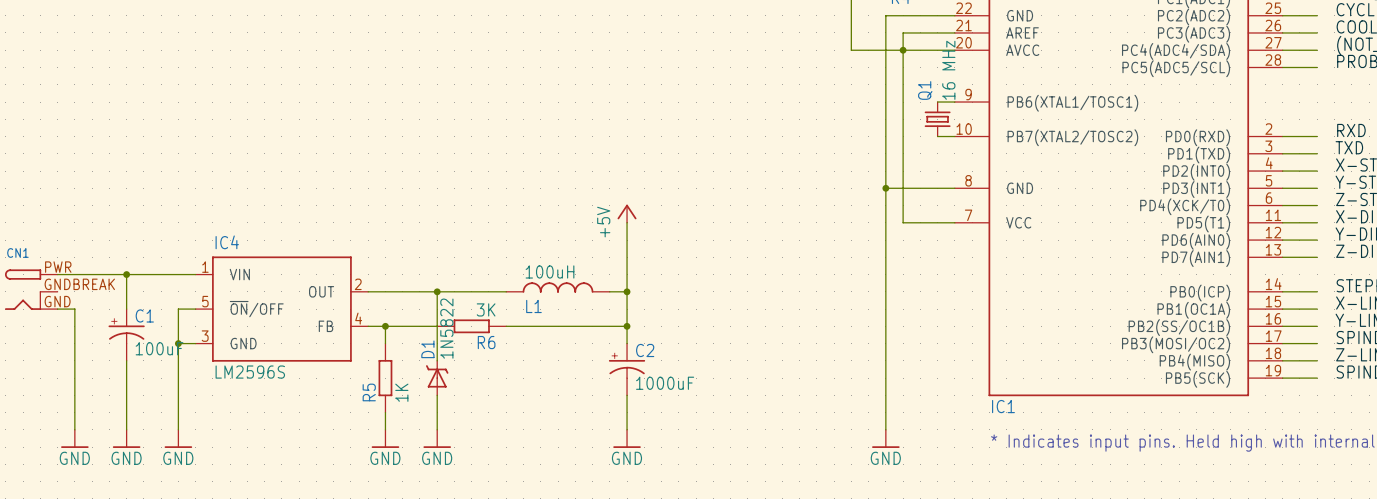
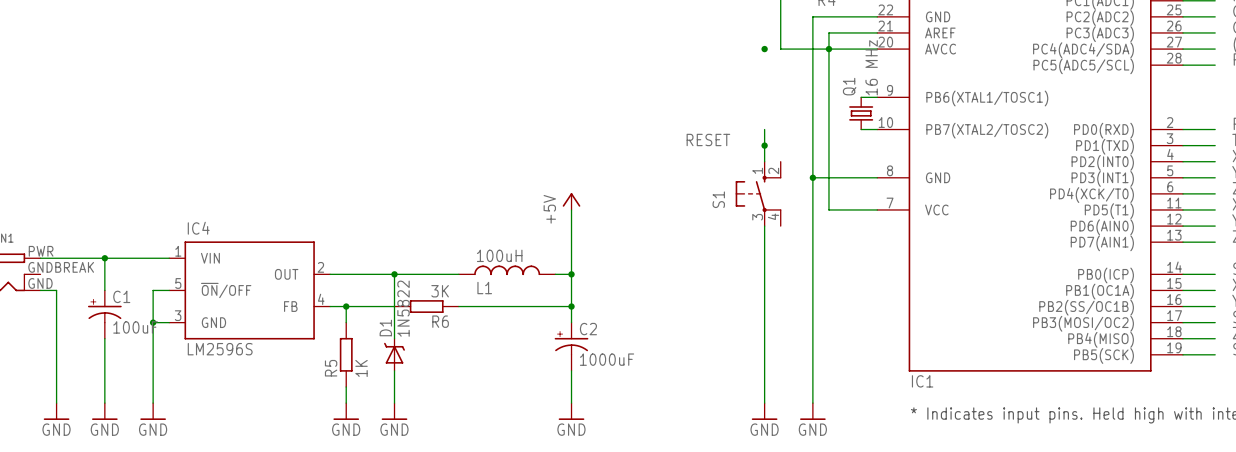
junction: none -> (764, 49)
wire: none -> (764, 129) (764, 161)
label: none -> RESET (708, 139)
junction: none -> (764, 145)
S1: none -> (758, 193)
wire: none -> (764, 226) (764, 403)
power symbol: none -> GND (764, 411)

